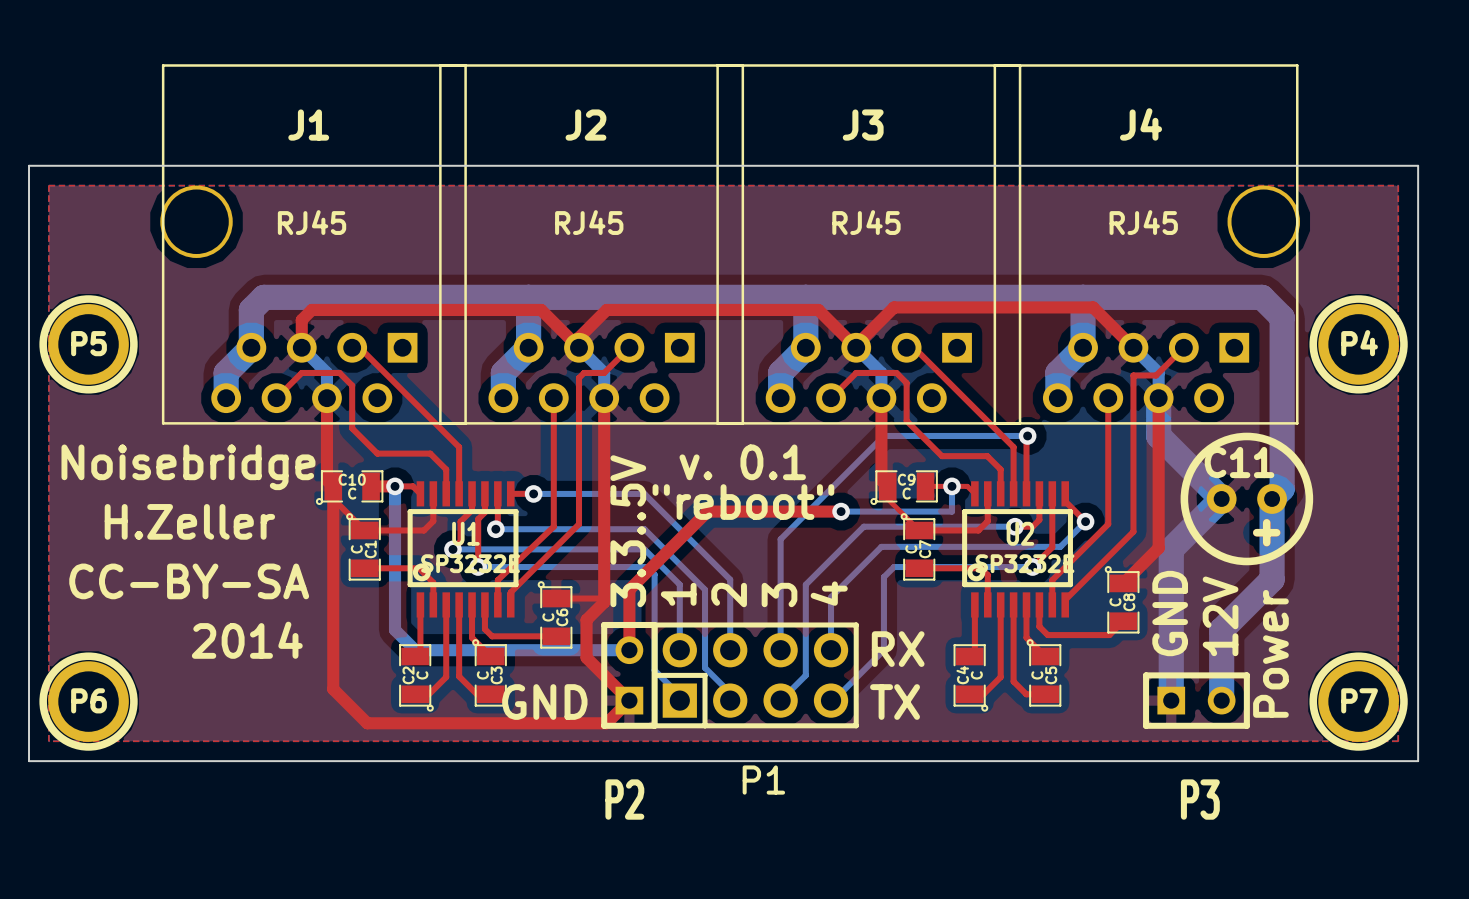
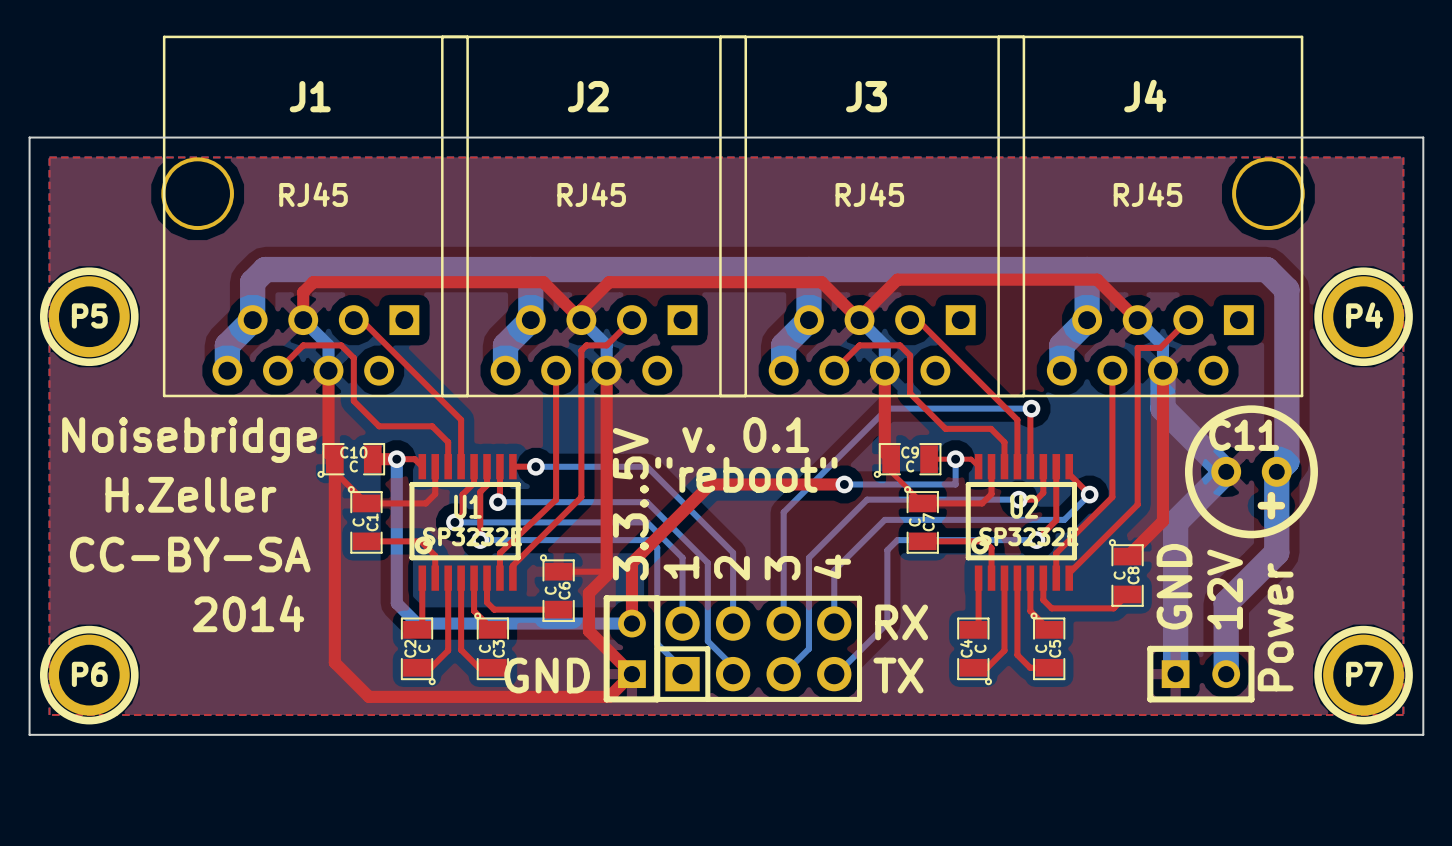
P1 name: P1 (763, 780) -> none
P2 name: P2 (624, 799) -> none
P3 name: P3 (1200, 799) -> none

